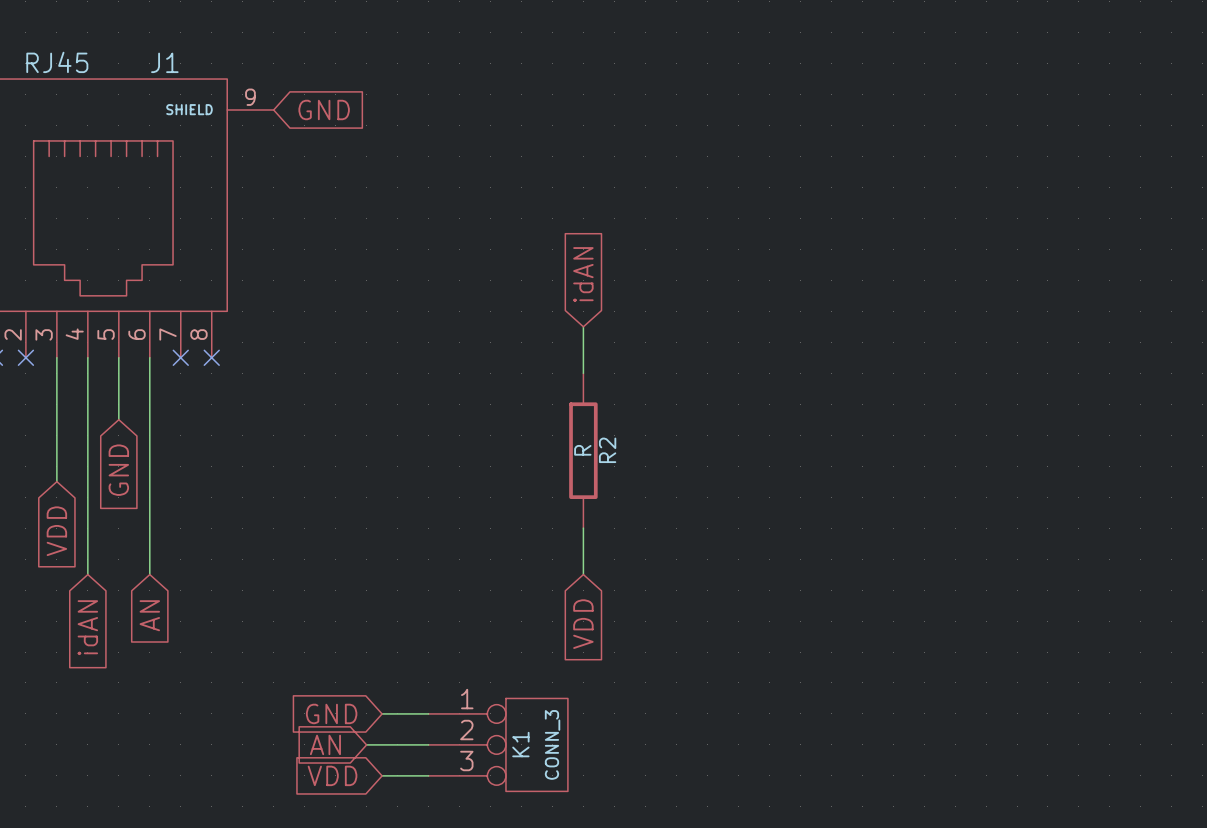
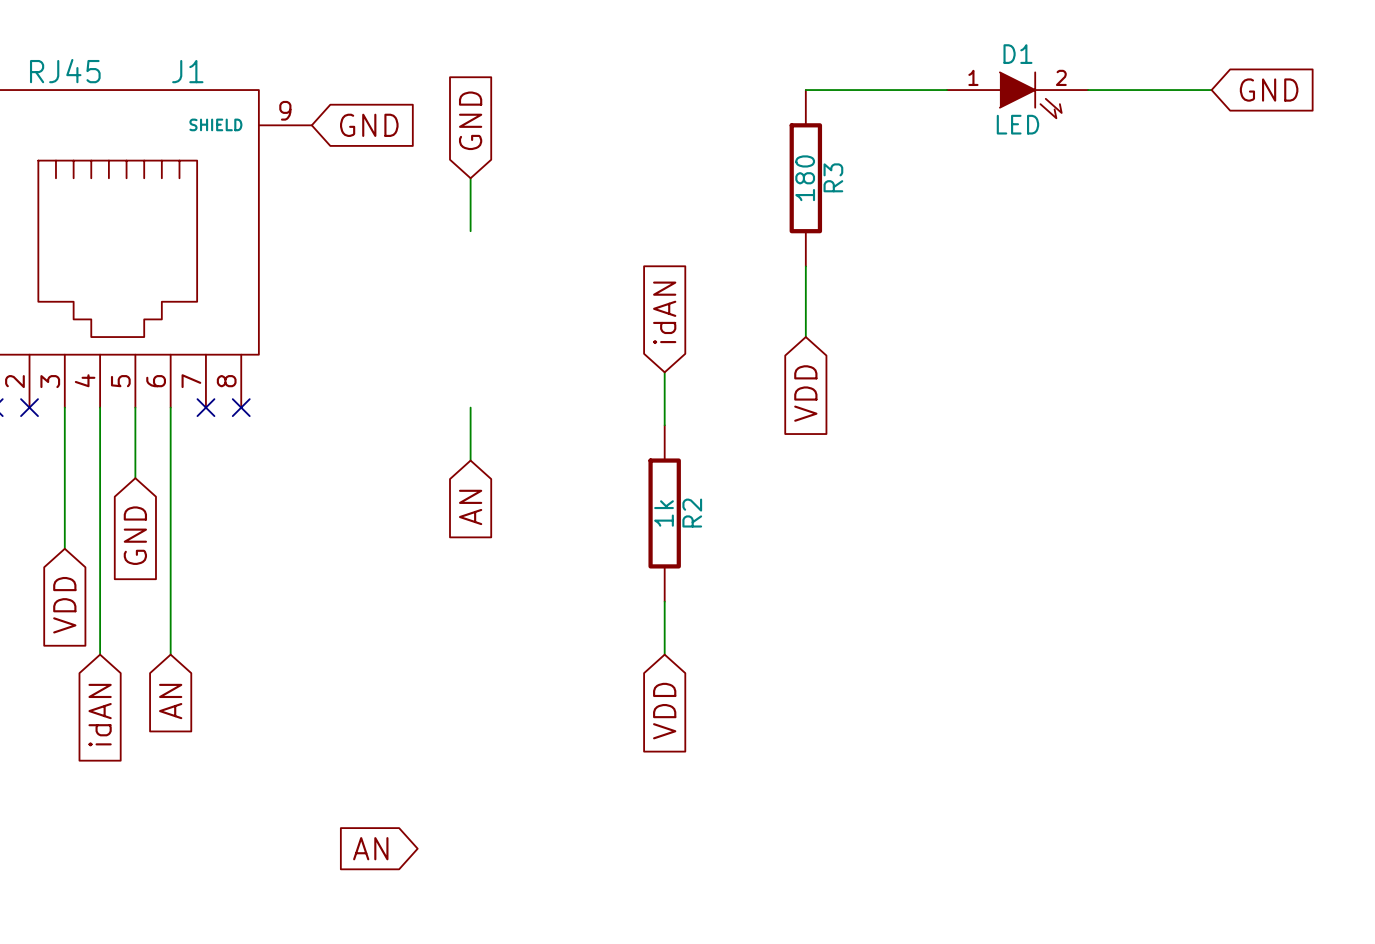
wire: none -> (805, 90) (946, 90)
wire: none -> (1088, 90) (1211, 90)
global label: none -> GND (1269, 90)
D1: none -> LED (1017, 95)
global label: none -> GND (470, 120)
wire: none -> (470, 178) (470, 231)
R3: none -> 180 (805, 178)
wire: none -> (805, 266) (805, 337)
global label: none -> VDD (805, 393)
wire: none -> (470, 407) (470, 460)
global label: none -> AN (470, 507)
R2 value: R (582, 450) -> 1k (664, 513)
global label: GND (331, 713) -> none
wire: (382, 713) (428, 713) -> none
wire: (366, 744) (428, 744) -> none
K1: CONN_3 (498, 744) -> none
global label: VDD (332, 775) -> none
wire: (382, 775) (428, 775) -> none

